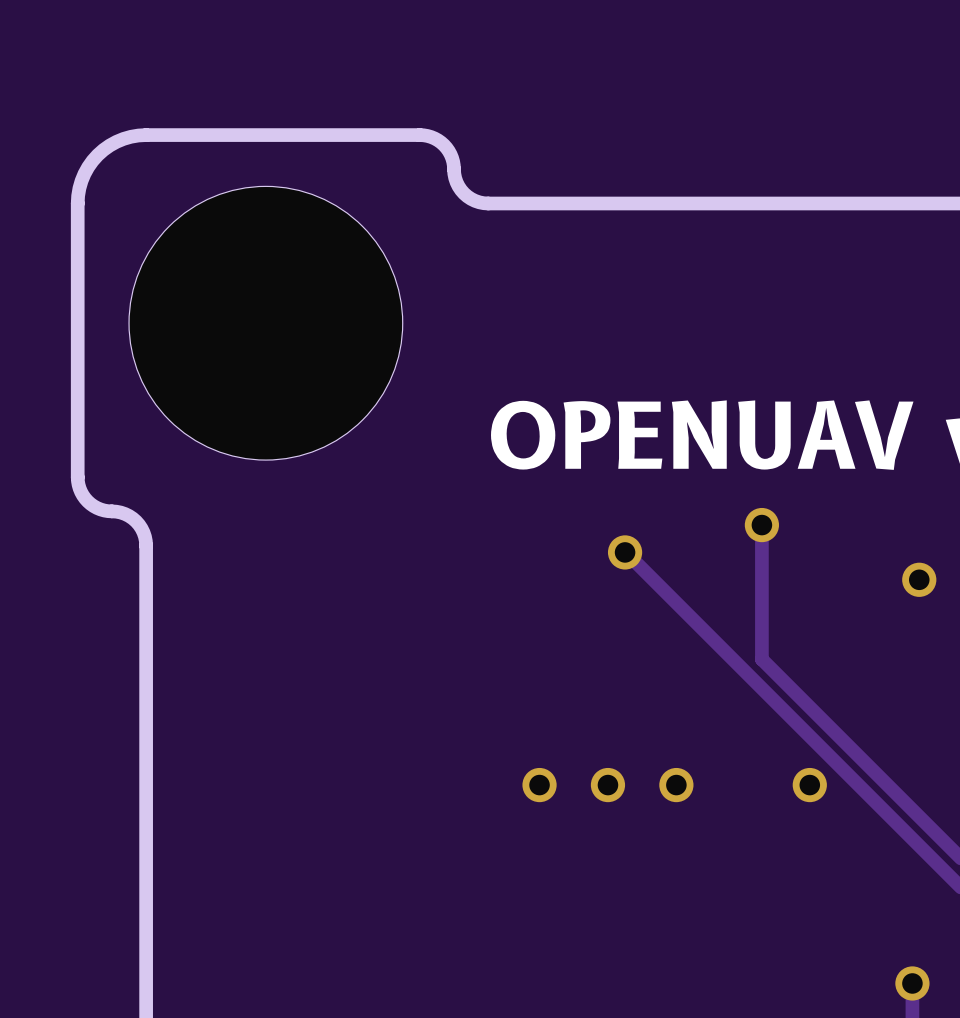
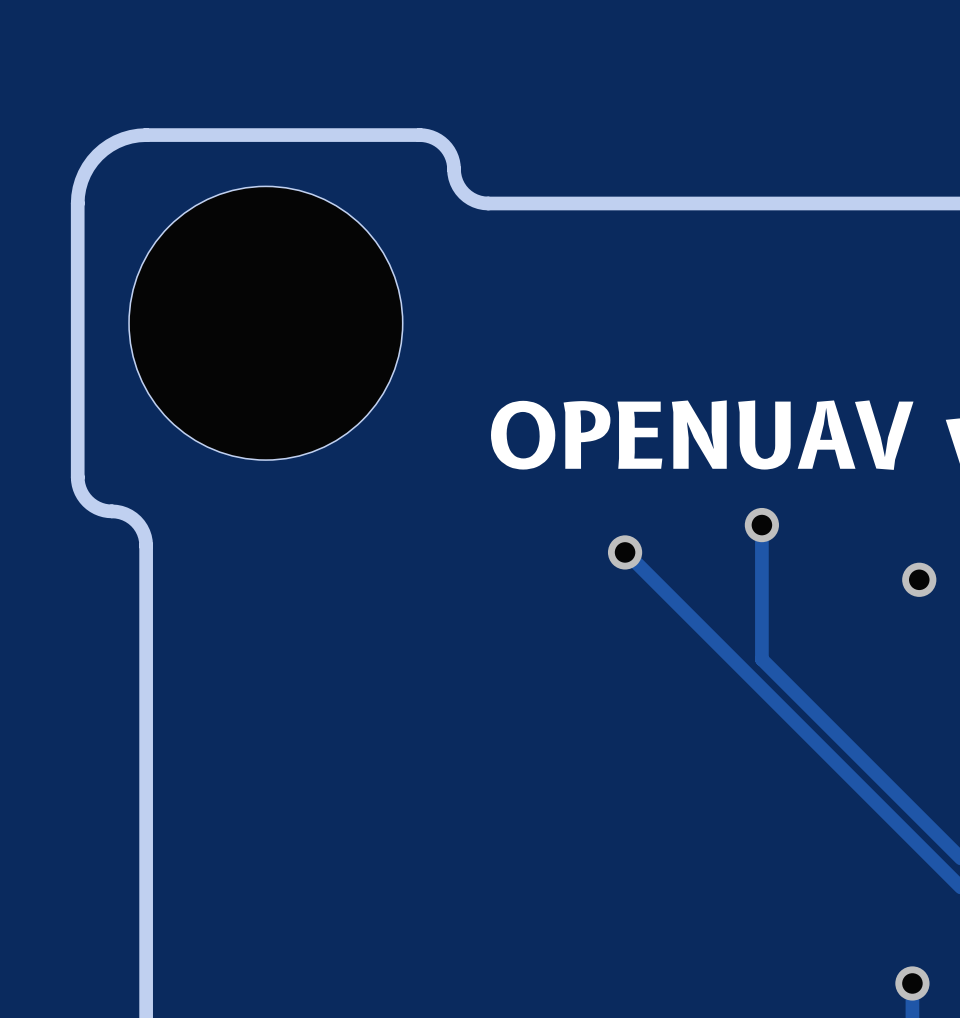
via: (539, 785) -> none
via: (607, 785) -> none
via: (676, 785) -> none
via: (809, 785) -> none

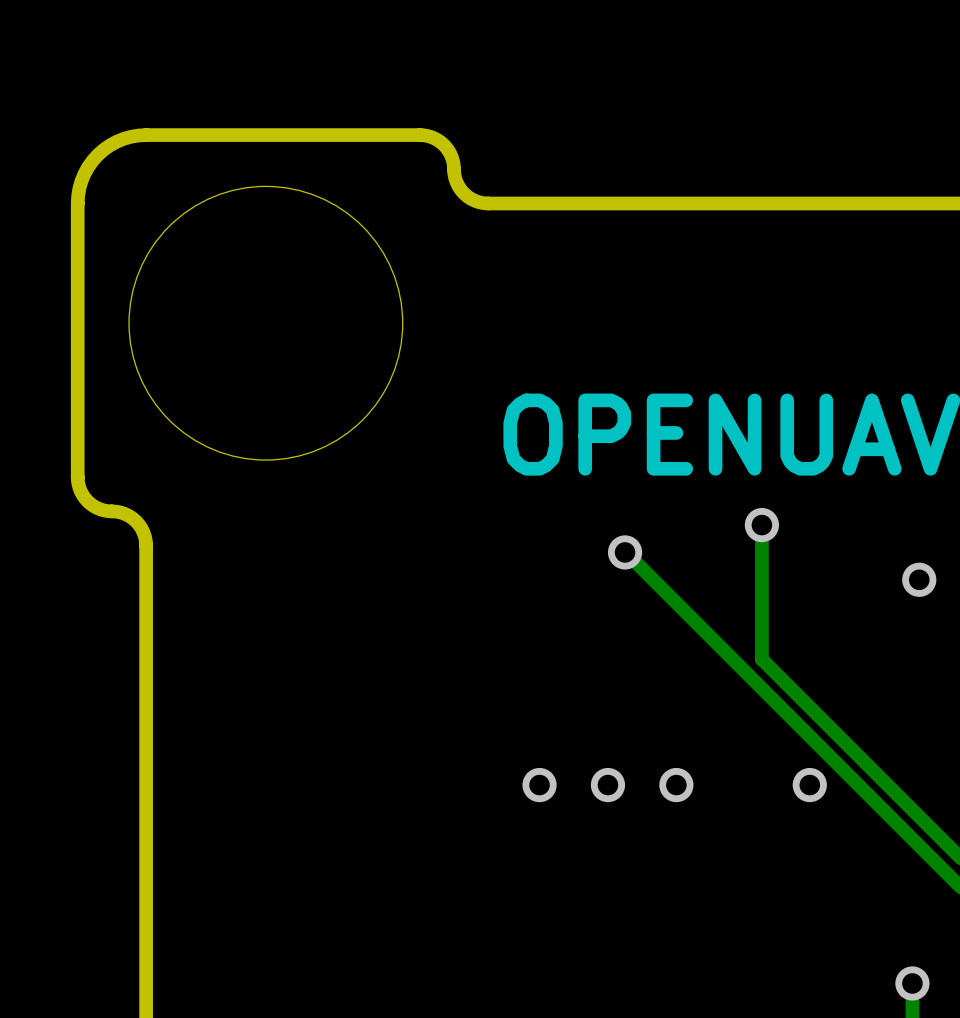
via: none -> (539, 785)
via: none -> (607, 785)
via: none -> (676, 785)
via: none -> (809, 785)

